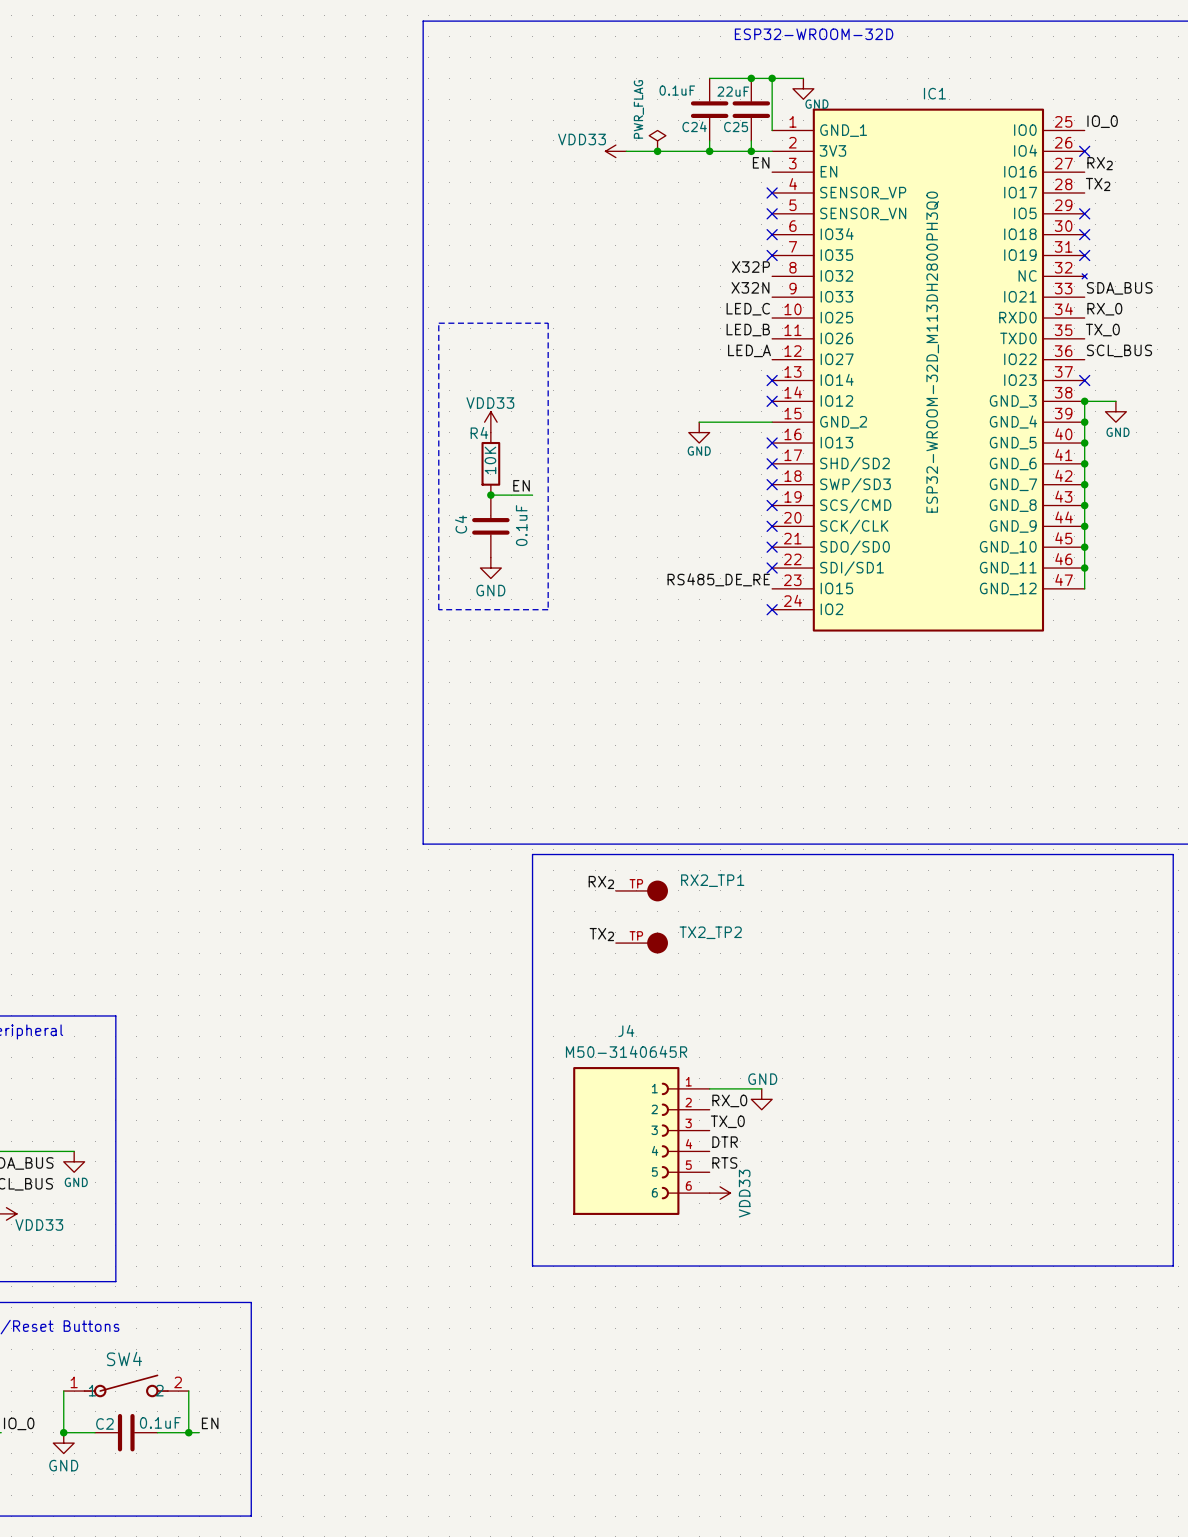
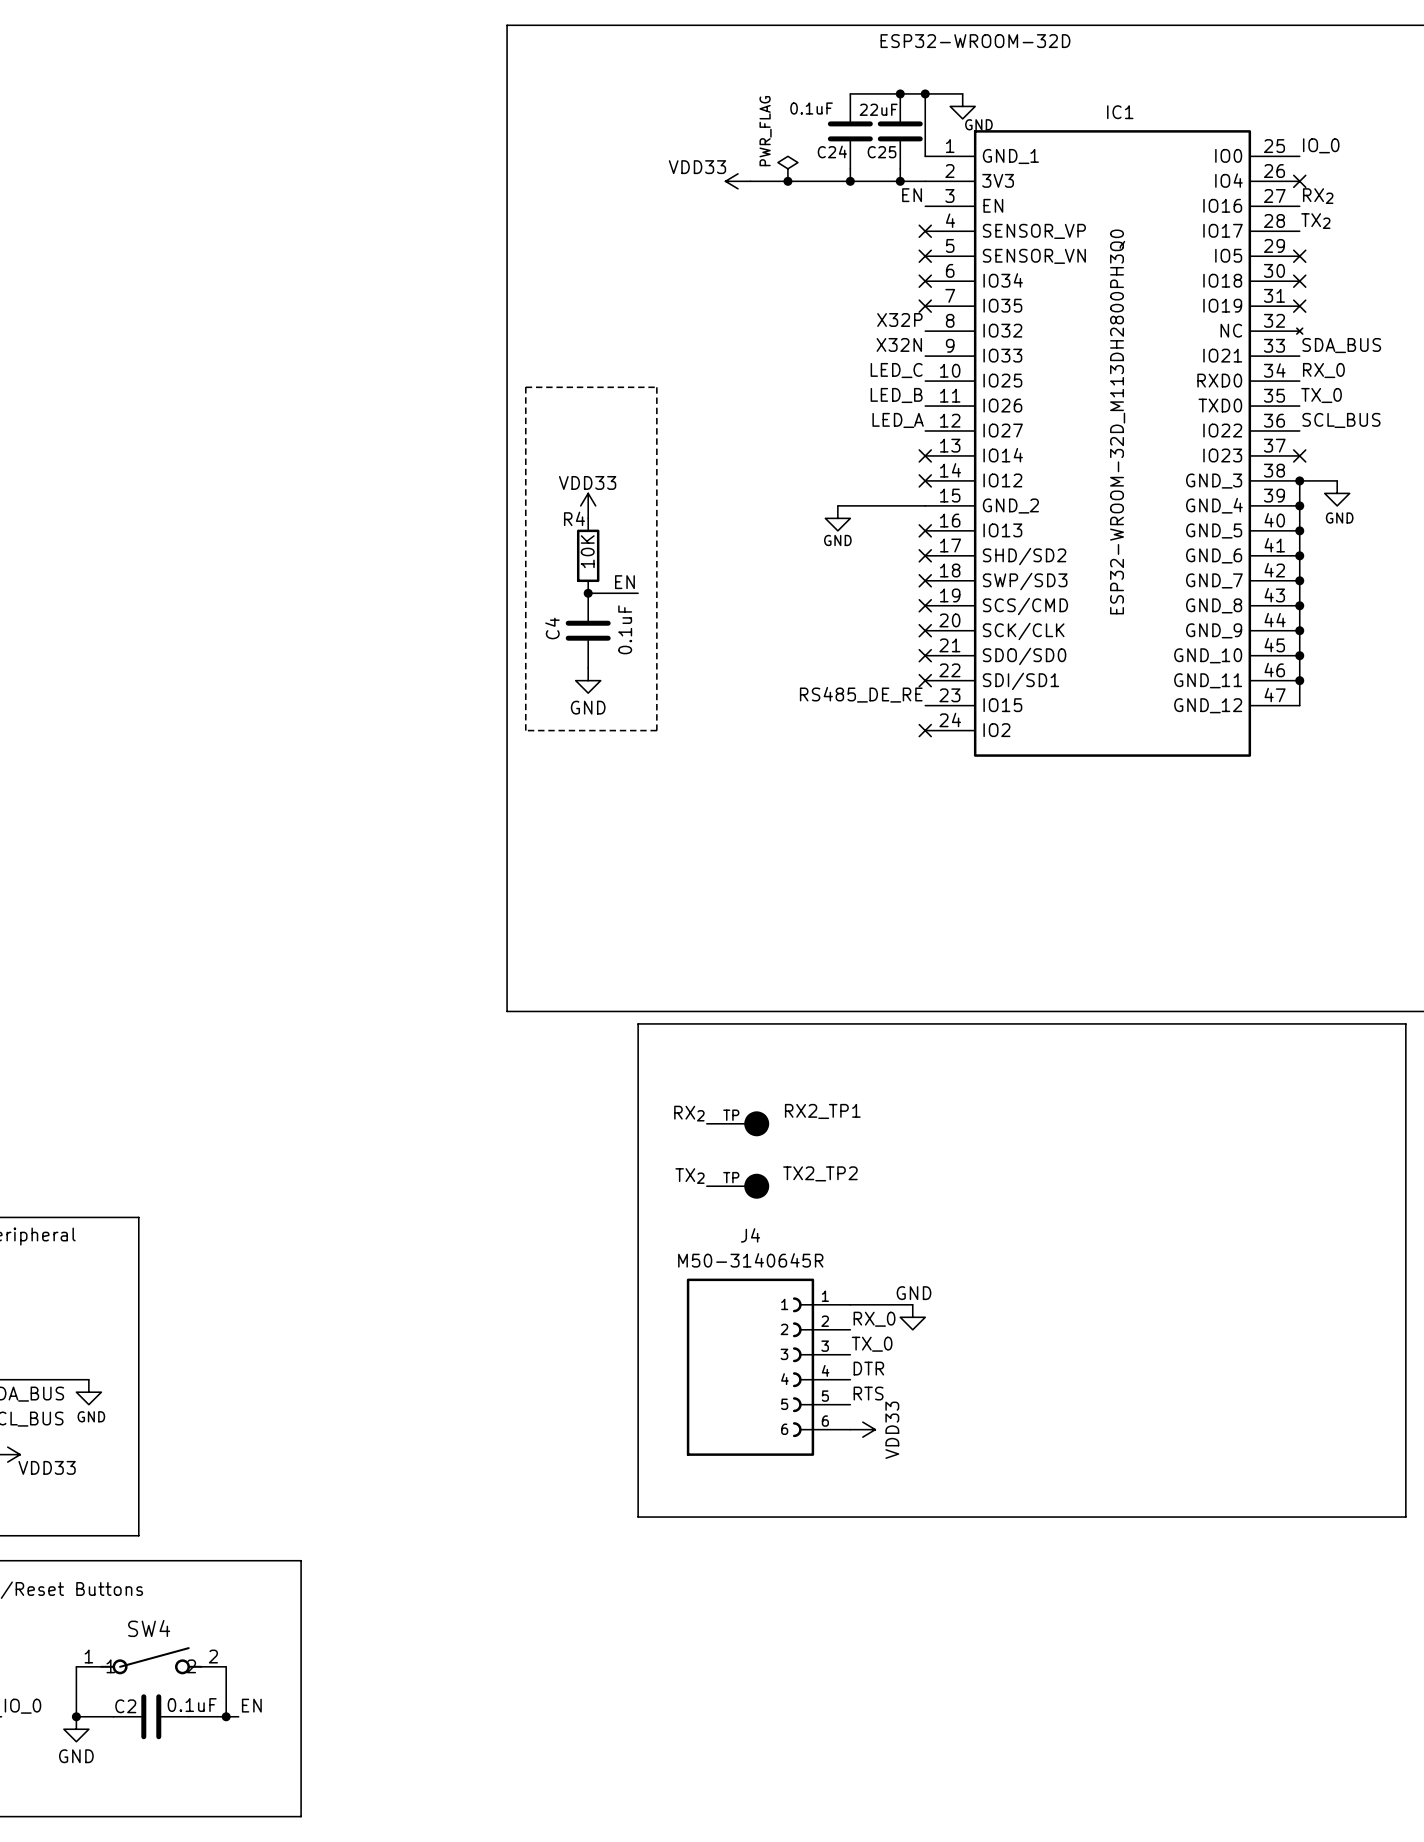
label position: RX2 (601, 882) -> RX2 (689, 1113)
RX2_TP1 position: (641, 890) -> (738, 1123)
label position: TX2 (601, 934) -> TX2 (689, 1176)
TX2_TP2 position: (641, 943) -> (738, 1186)

